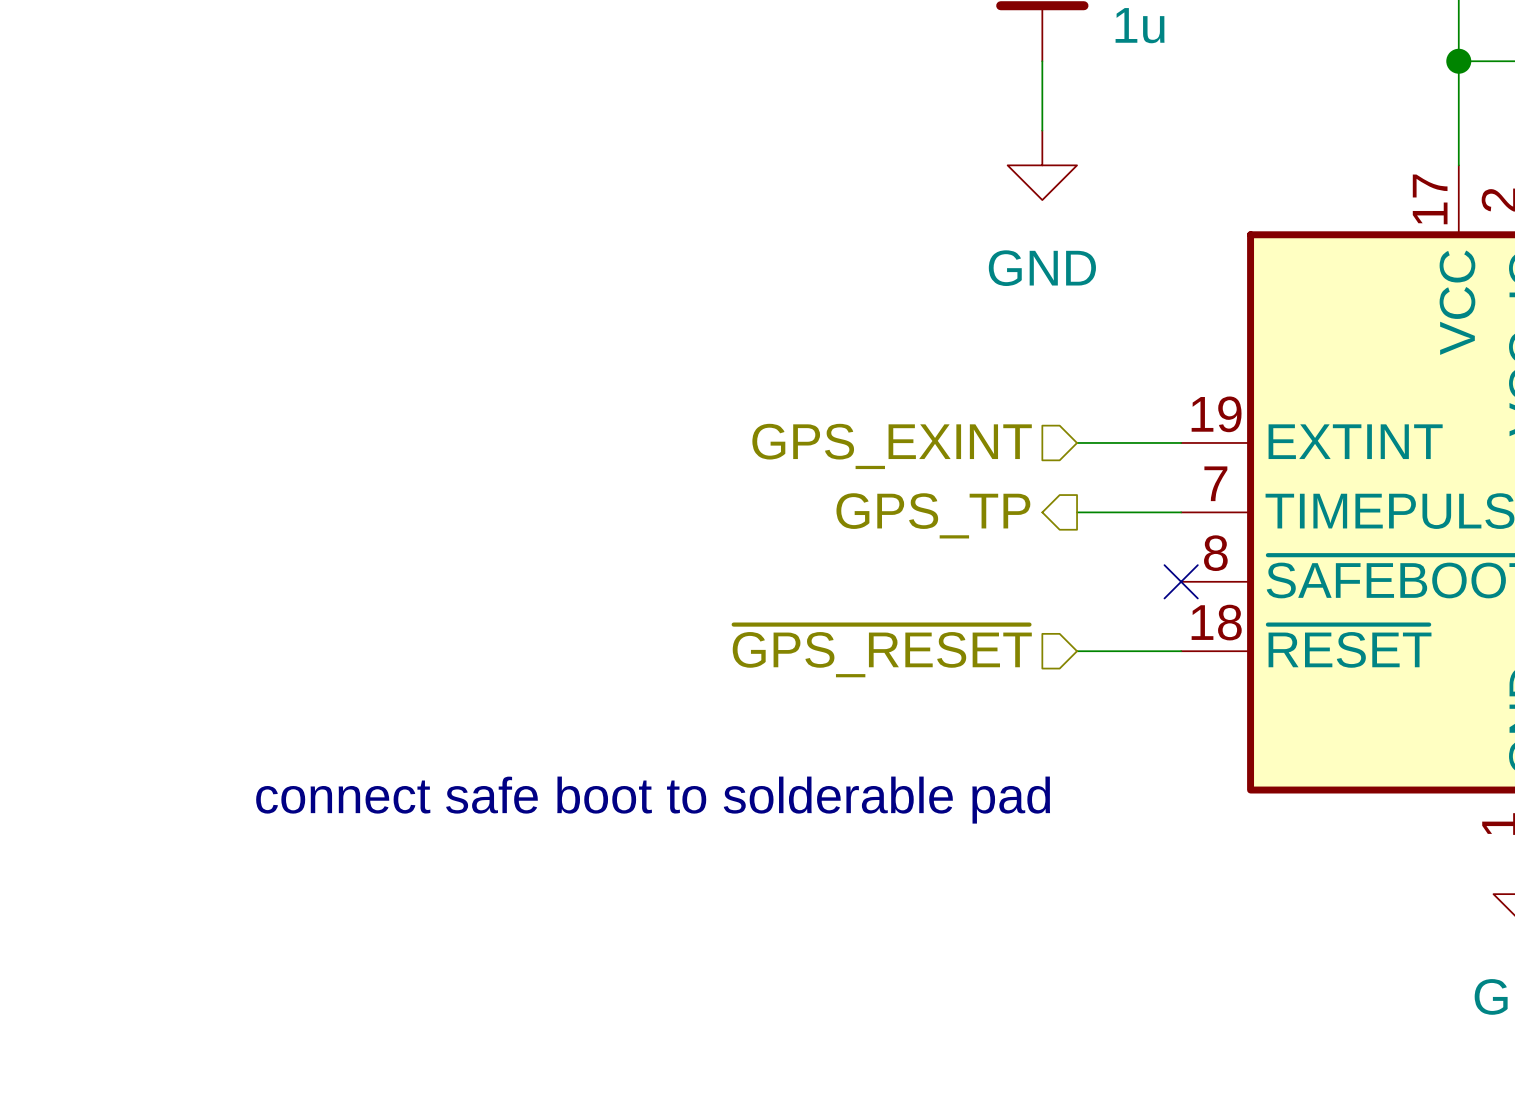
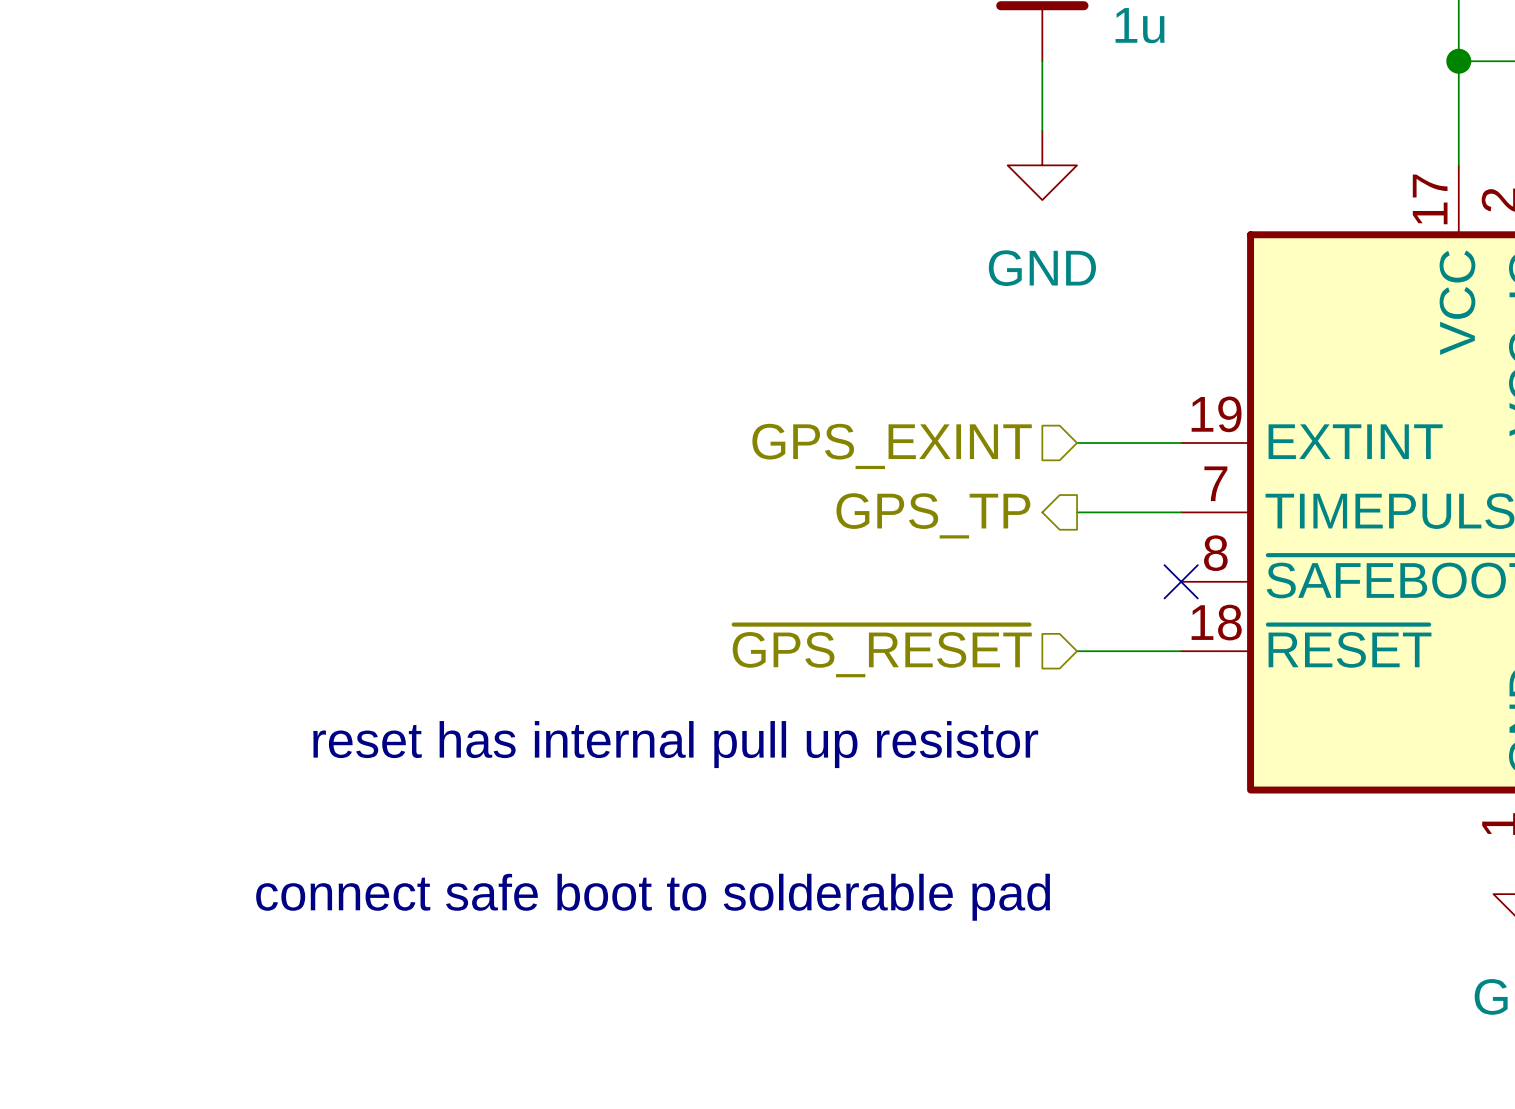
text: none -> reset has internal pull up resistor (675, 744)
text position: connect safe boot to solderable pad (653, 800) -> connect safe boot to solderable pad (653, 897)

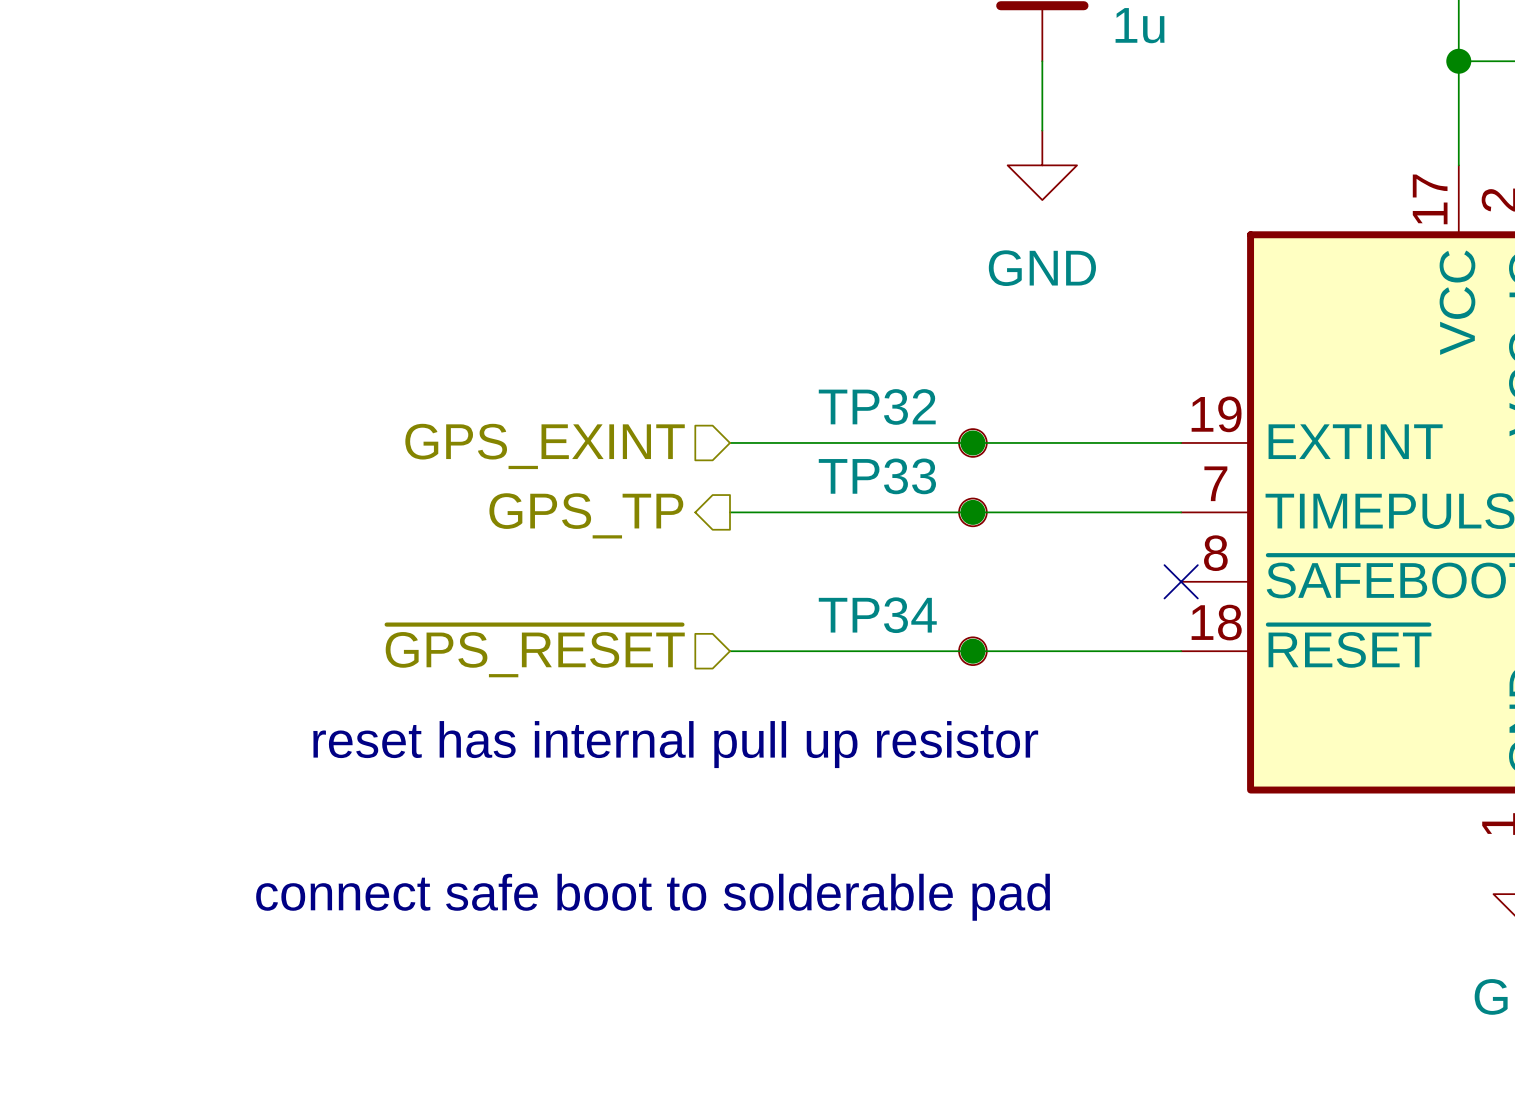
wire: none -> (730, 442) (1077, 442)
TP32: none -> (972, 442)
junction: none -> (972, 442)
hierarchical label position: GPS_EXINT (892, 446) -> GPS_EXINT (545, 446)
wire: none -> (730, 512) (1077, 512)
TP33: none -> (972, 512)
junction: none -> (972, 512)
hierarchical label position: GPS_TP (933, 515) -> GPS_TP (586, 515)
hierarchical label position: ~{GPS_RESET} (882, 650) -> ~{GPS_RESET} (535, 650)
wire: none -> (730, 651) (1077, 651)
TP34: none -> (972, 651)
junction: none -> (972, 651)

